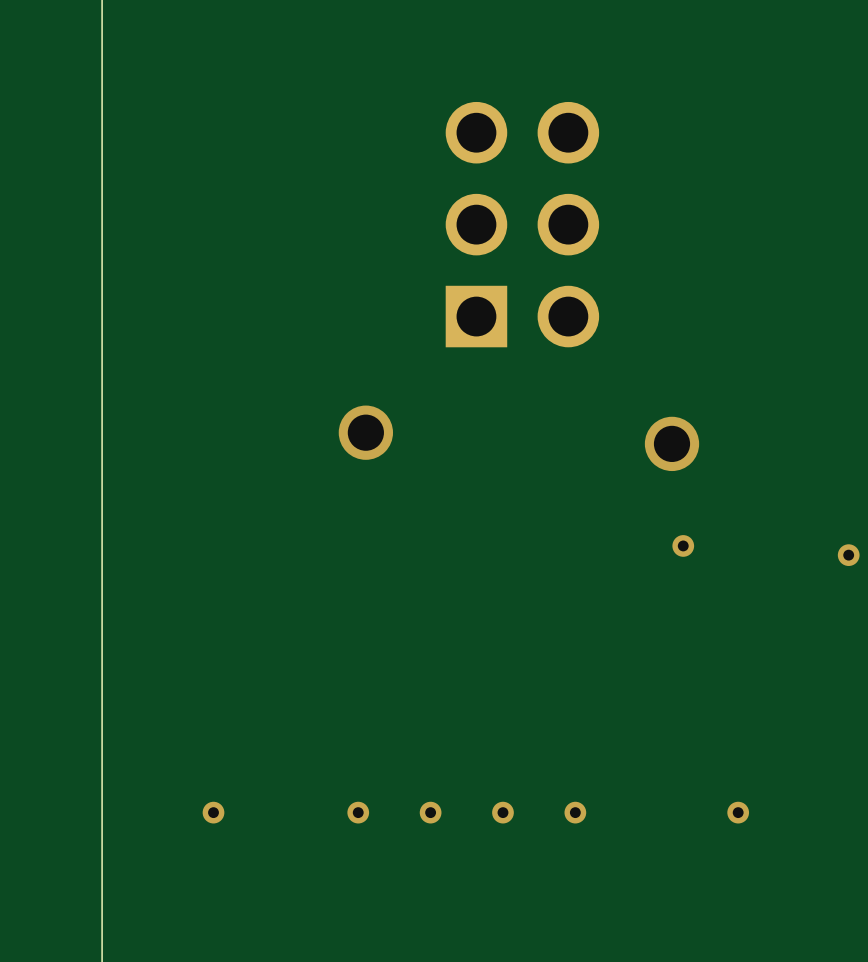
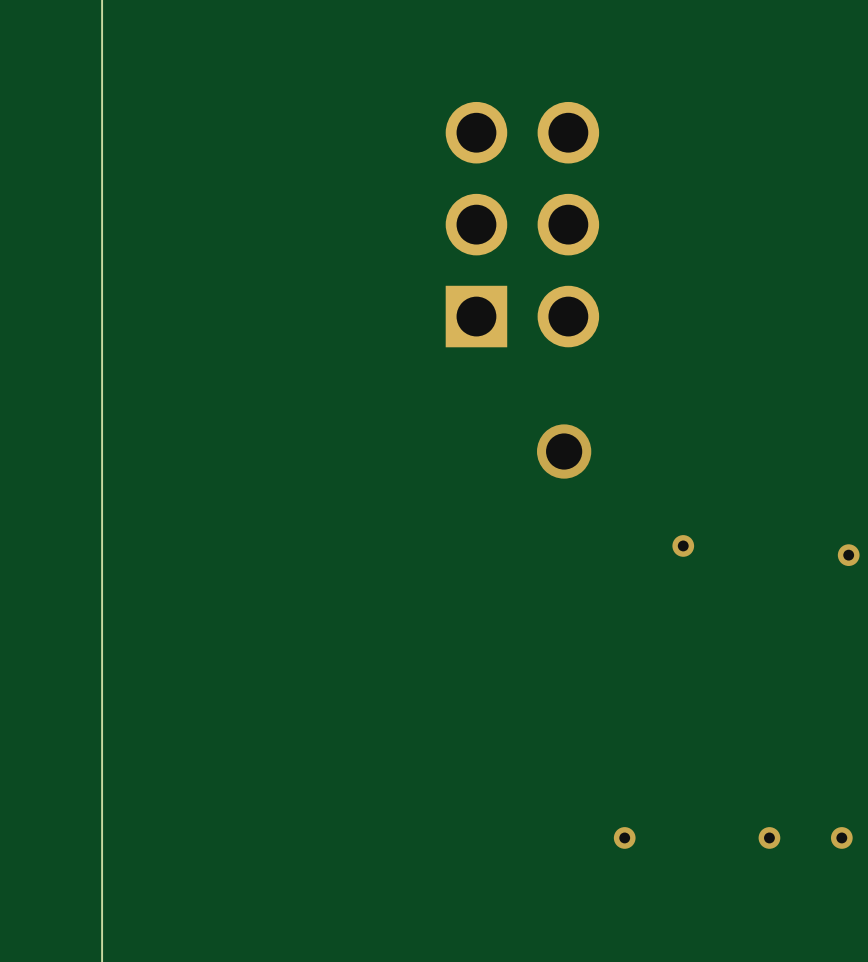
via: (365, 432) -> none
via: (672, 443) -> none
via: none -> (564, 451)
via: (213, 812) -> none
via: (358, 812) -> none
via: (430, 812) -> none
via: (502, 812) -> none
via position: (575, 812) -> (624, 837)
via position: (738, 812) -> (769, 837)
via: none -> (841, 837)

